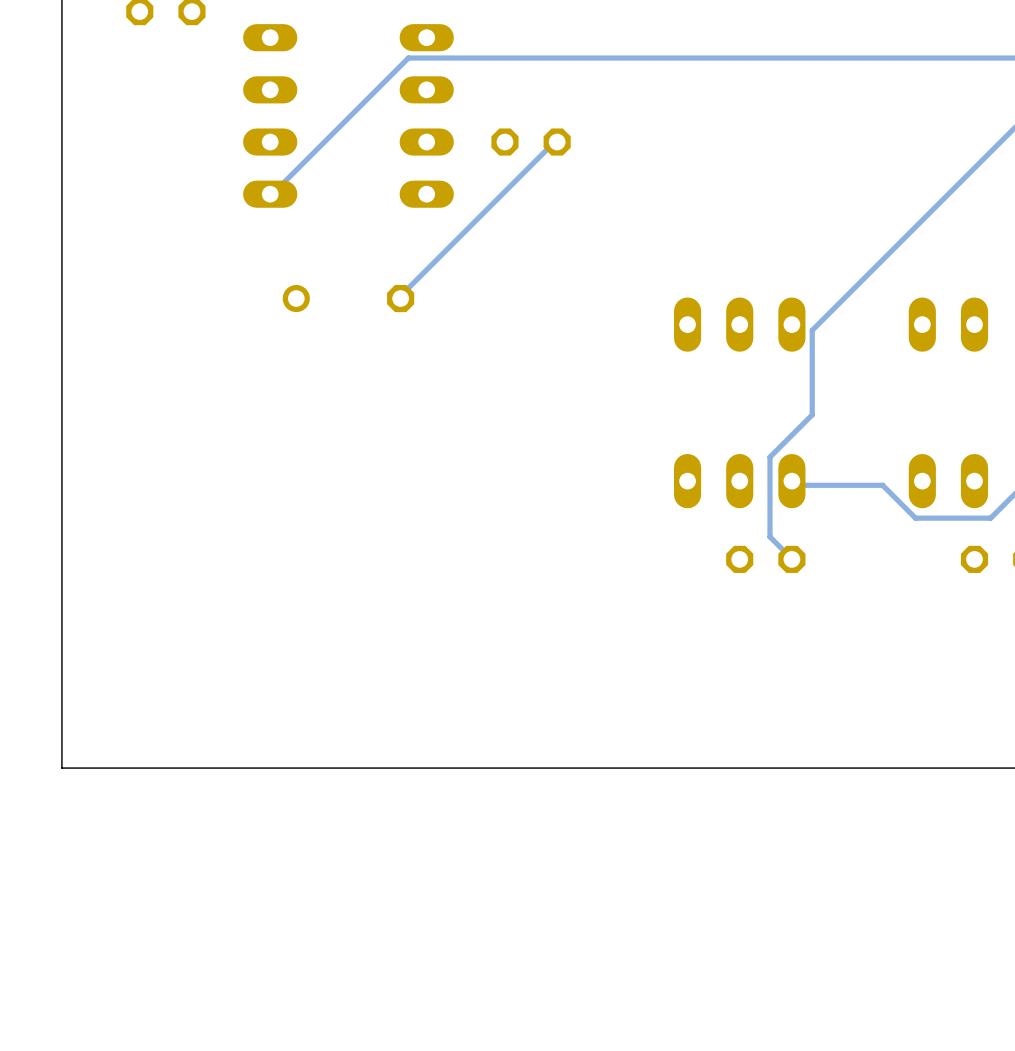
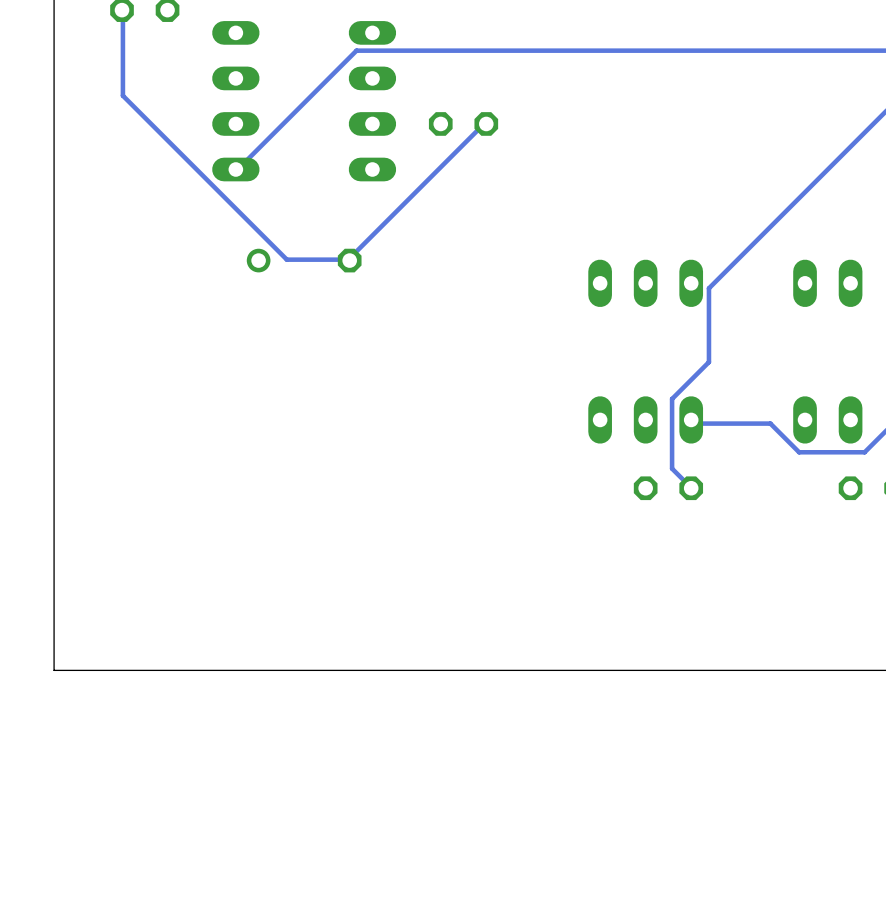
track: none -> (122, 10) (122, 95) (286, 259) (348, 259)

